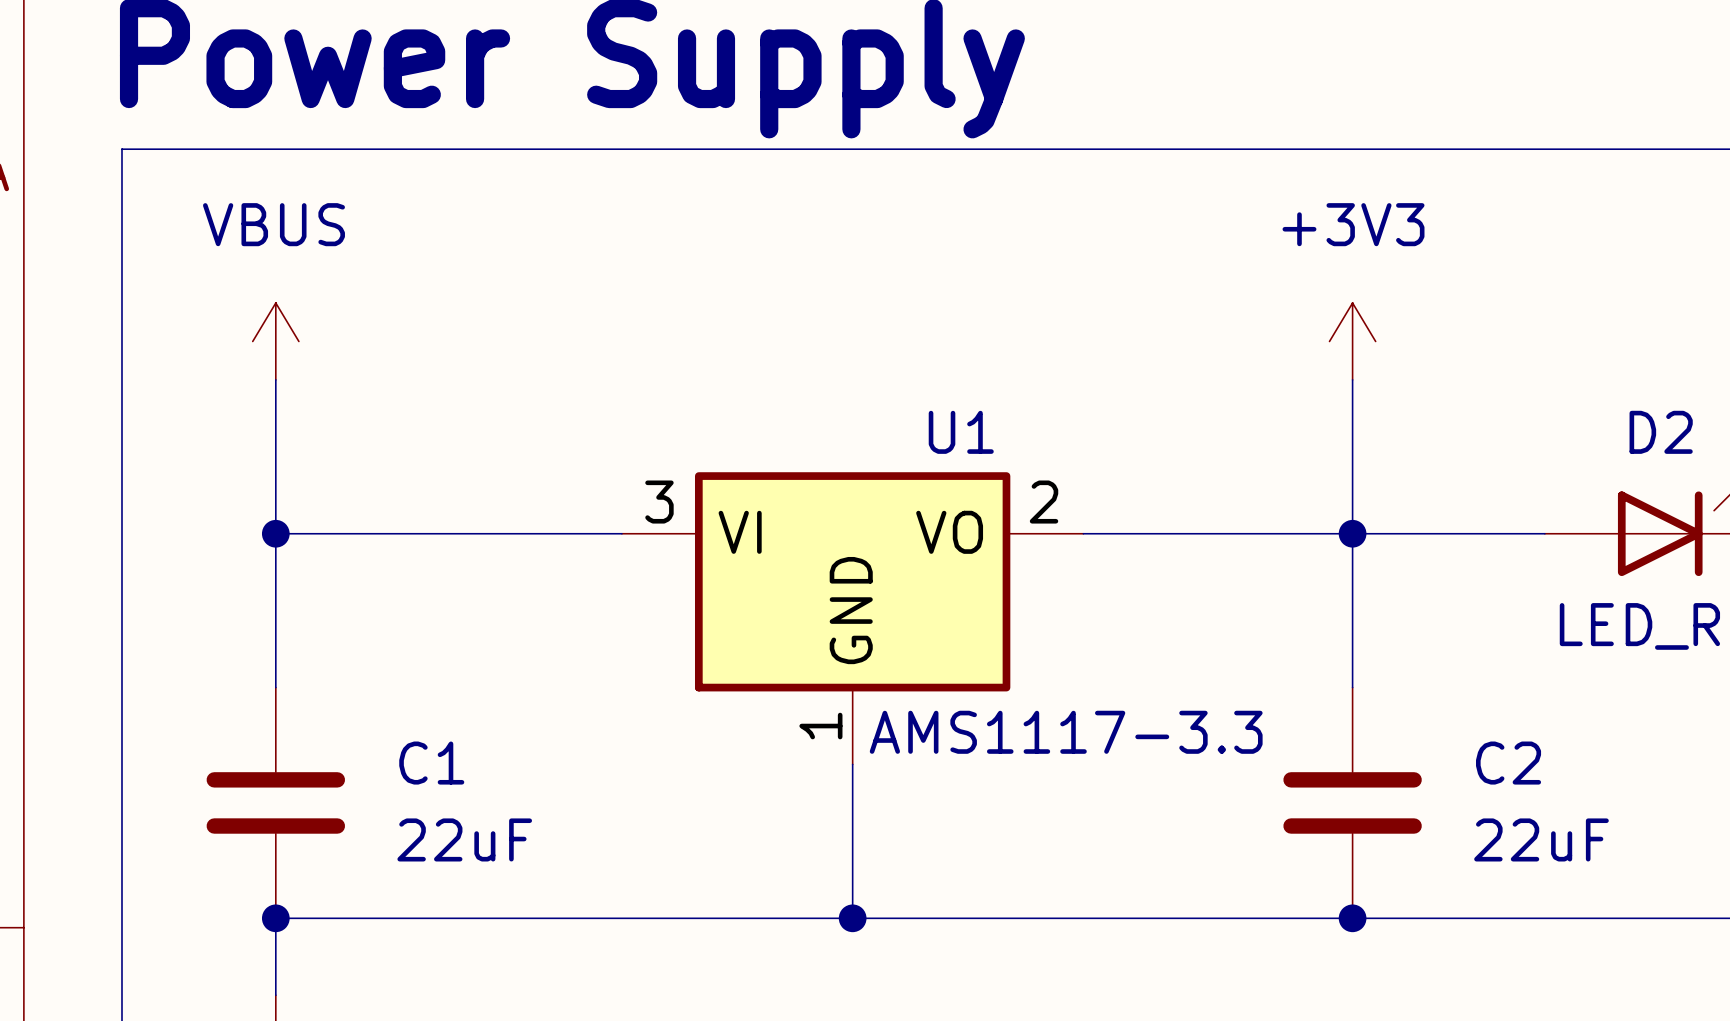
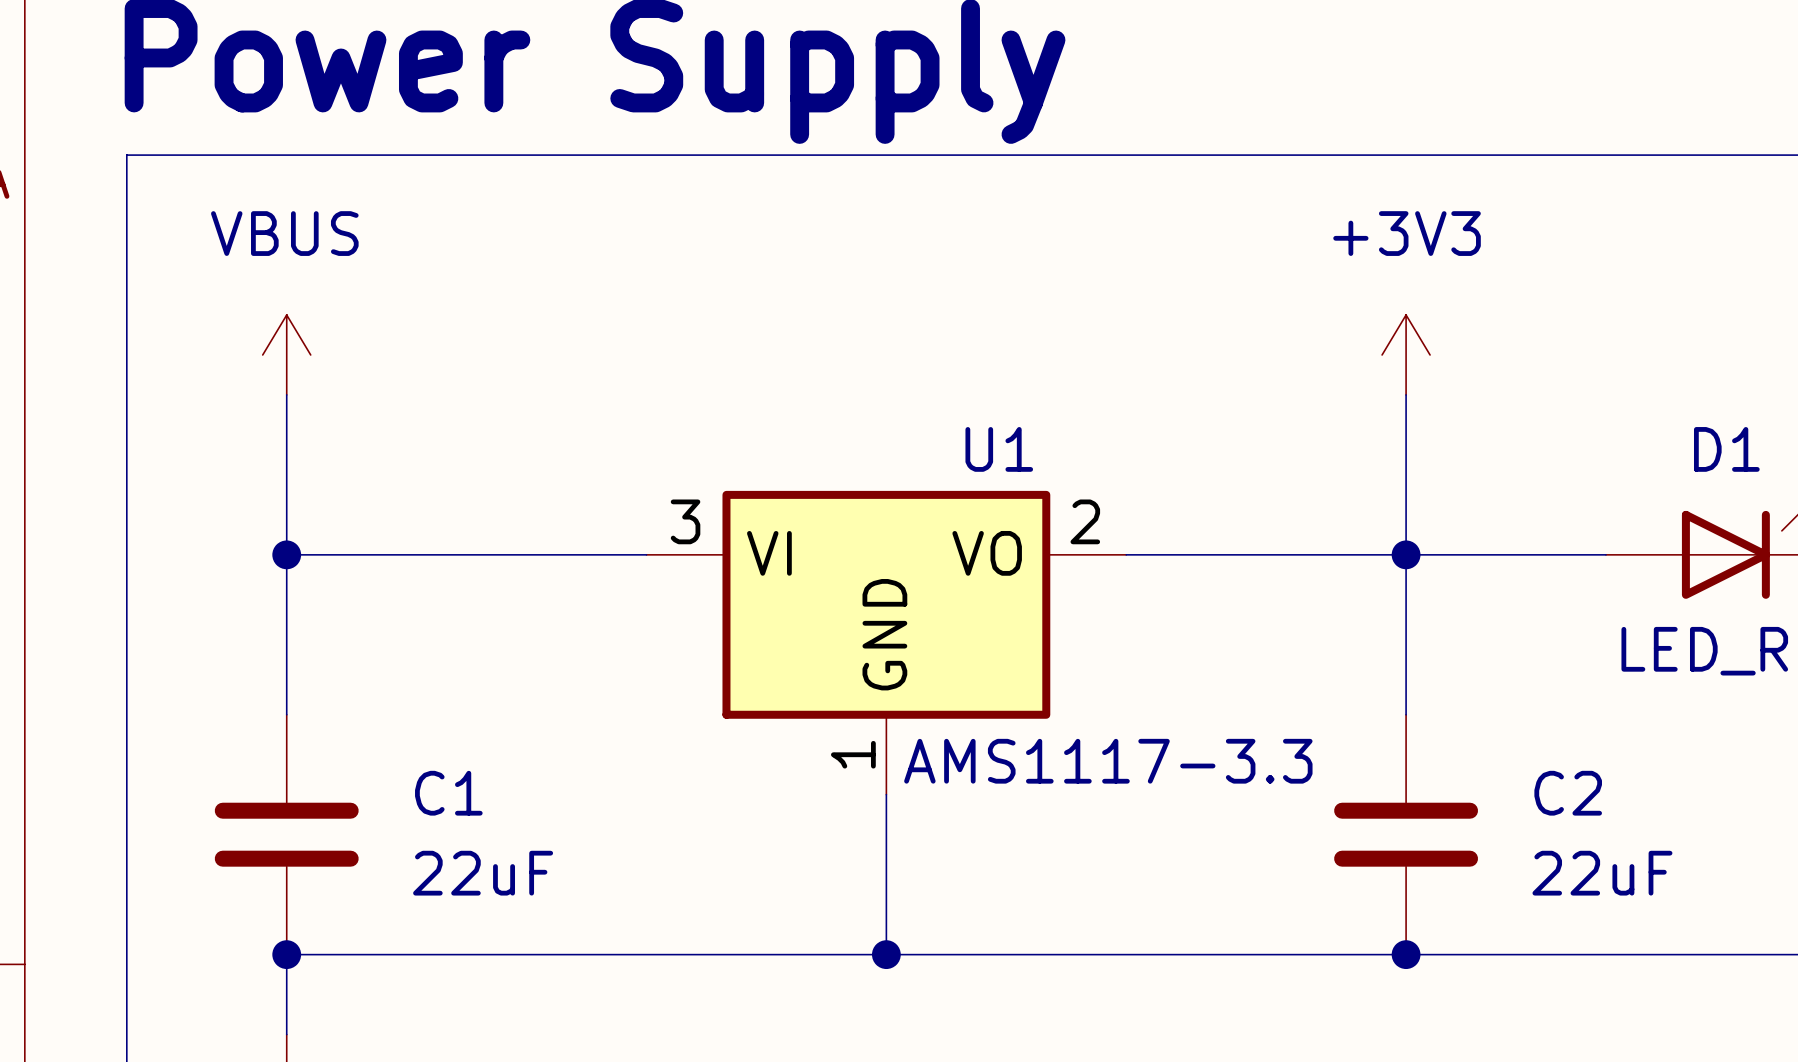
D2 name: D2 (1661, 432) -> D1 (1726, 449)

